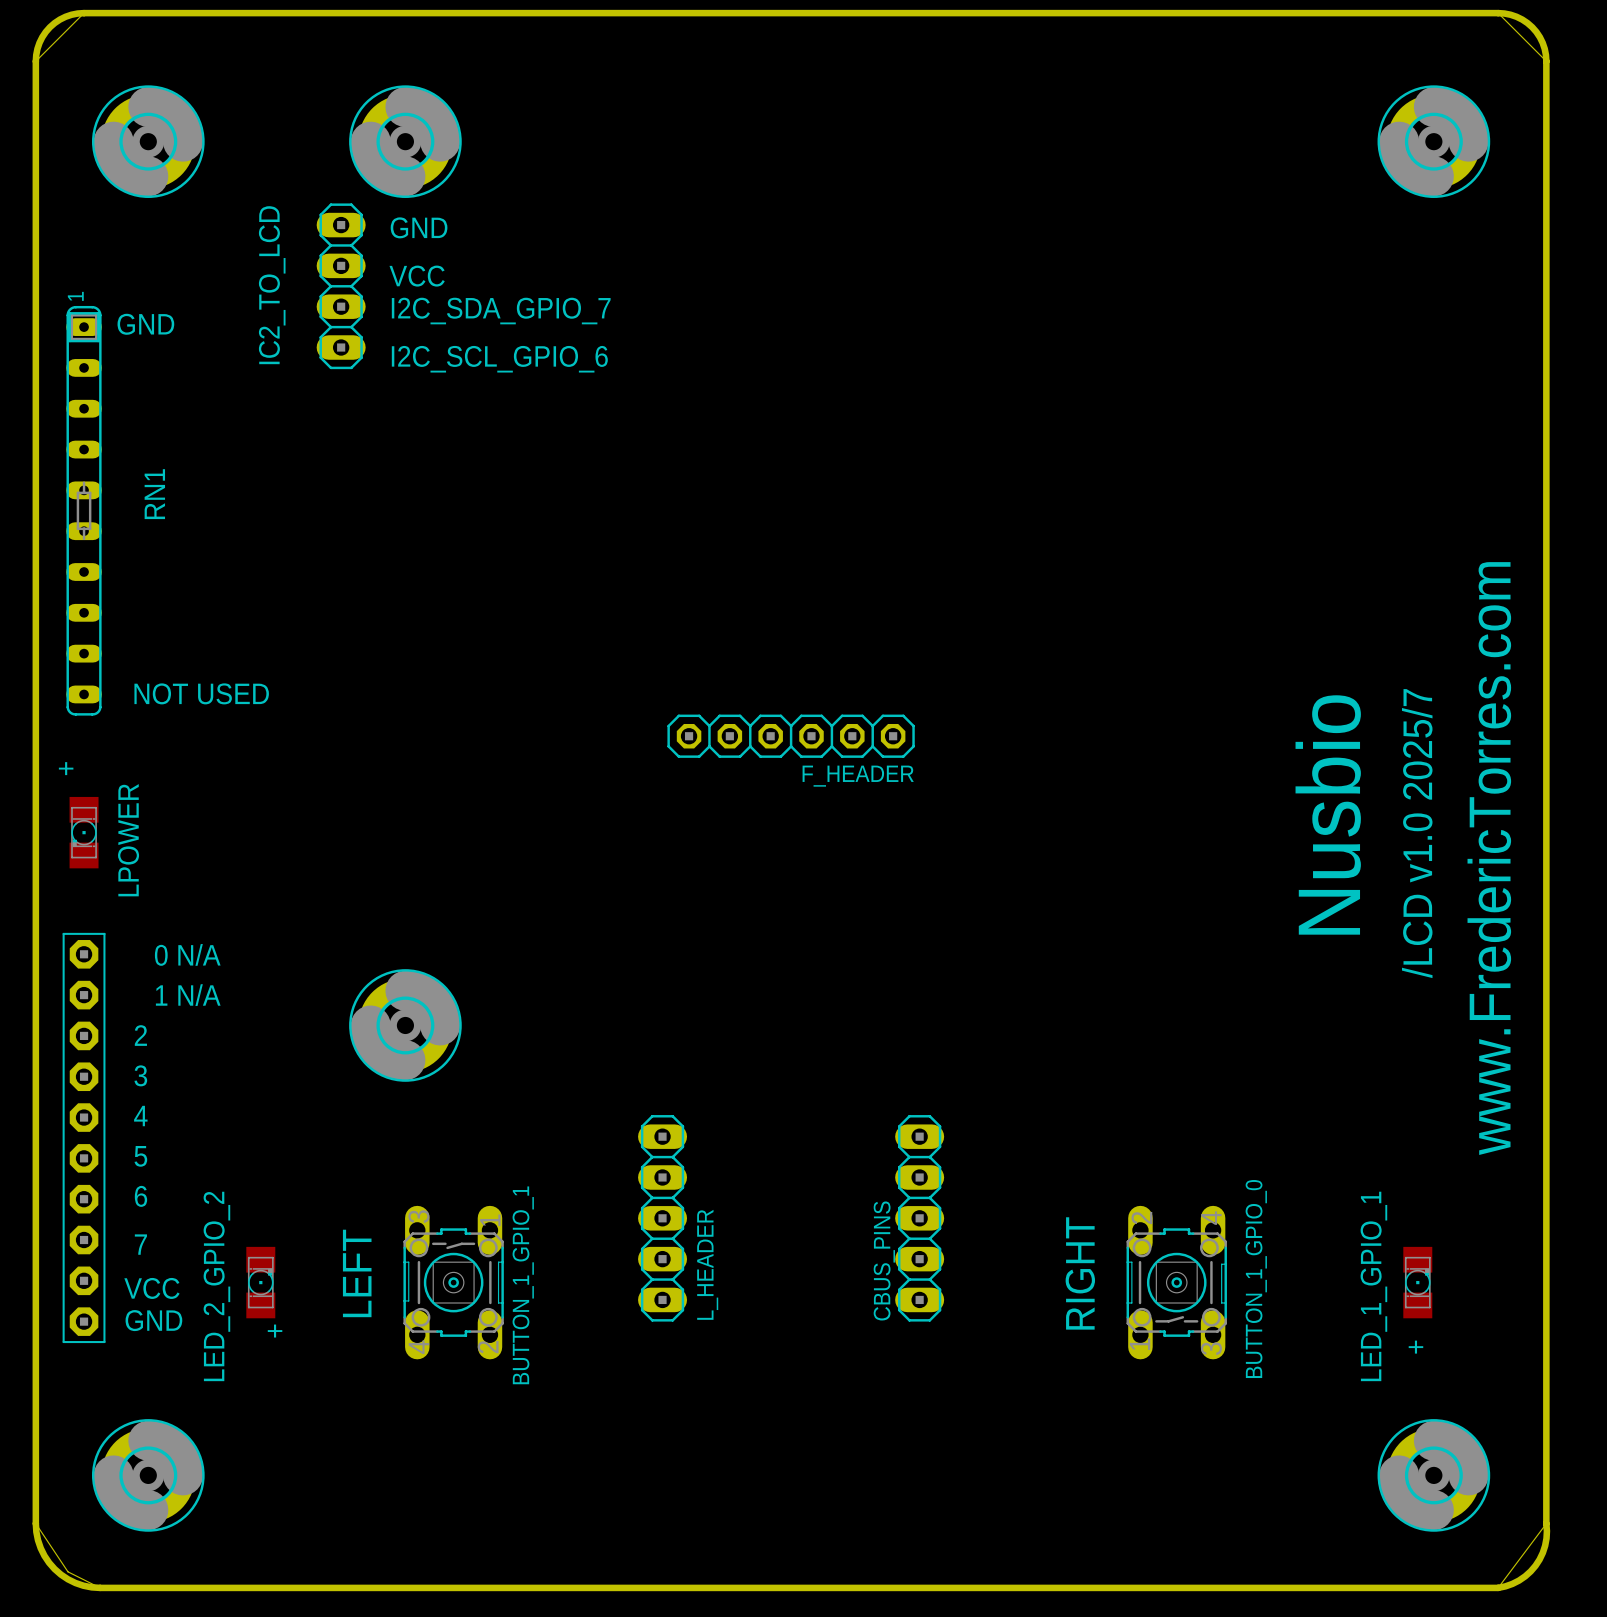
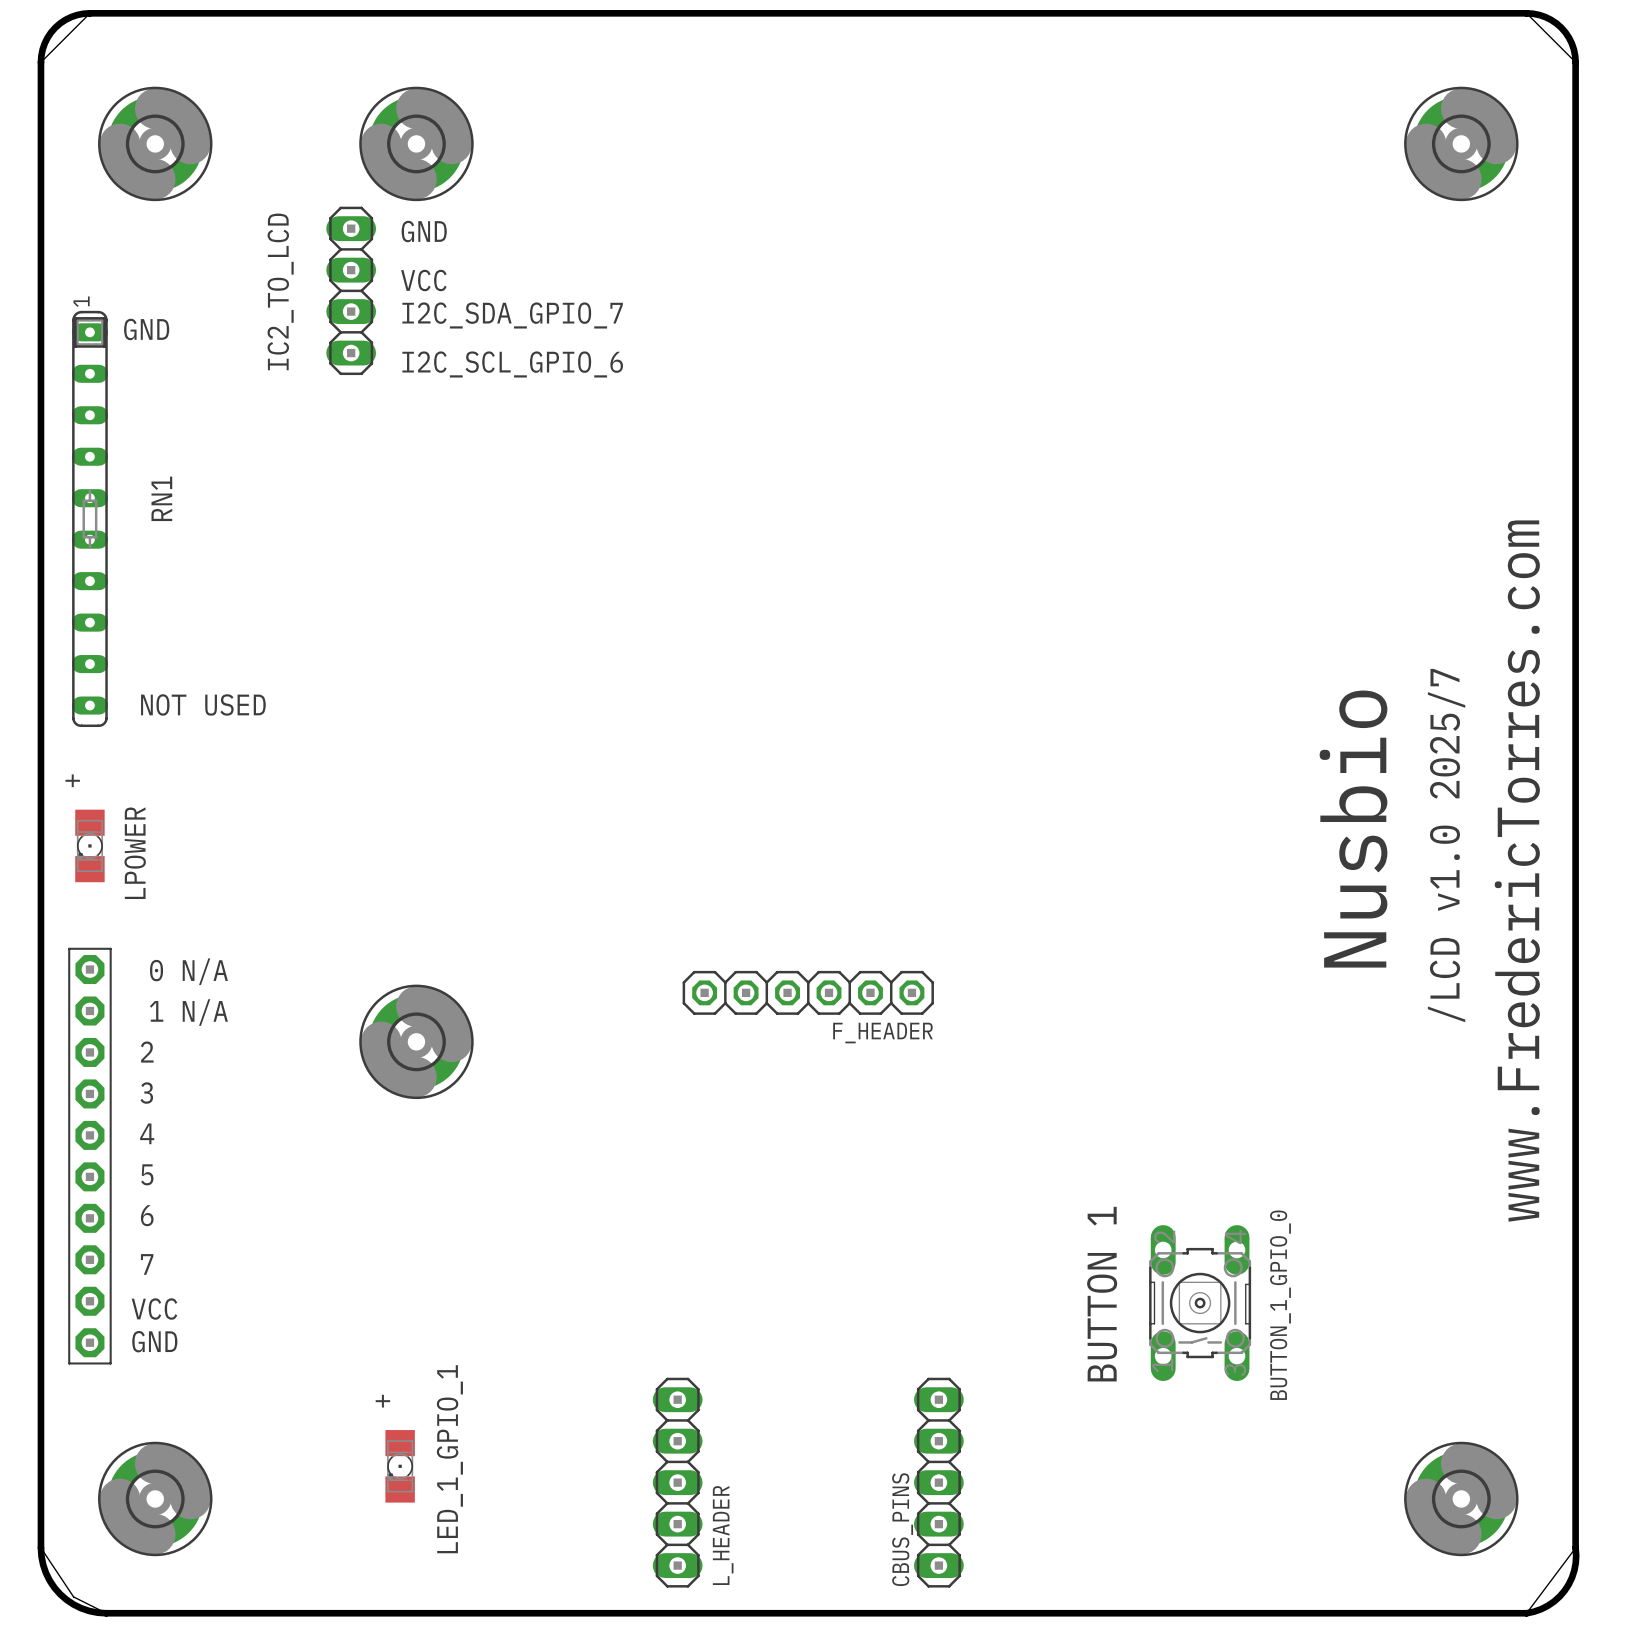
F_HEADER position: (791, 736) -> (808, 992)
L_HEADER position: (662, 1218) -> (677, 1482)
CBUS_PINS position: (919, 1218) -> (938, 1482)
text: LEFT (357, 1273) -> none
text: RIGHT (1080, 1273) -> BUTTON 1 (1102, 1294)
LED_2_GPIO_2: (260, 1282) -> none
BUTTON_1_GPIO_1: (453, 1282) -> none
LED_1_GPIO_1 rotation: 0° (1417, 1282) -> 180° (400, 1466)
LED_1_GPIO_1 position: (1417, 1282) -> (400, 1466)
text position: + (275, 1331) -> + (382, 1401)
text: + (1415, 1347) -> none

